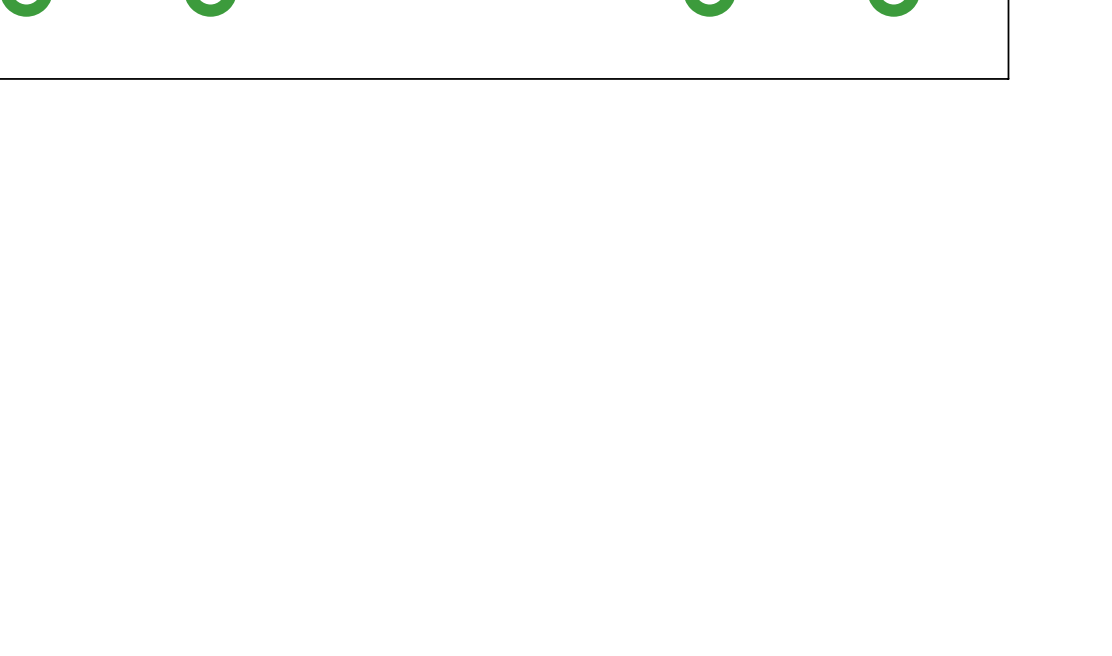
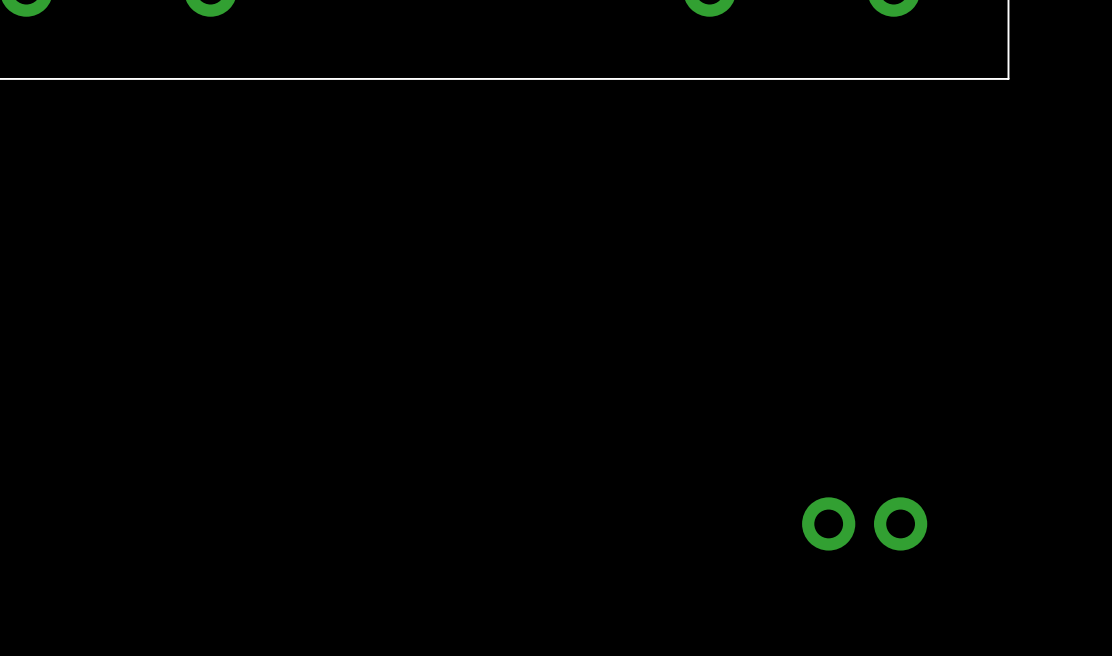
part: none -> (864, 523)

